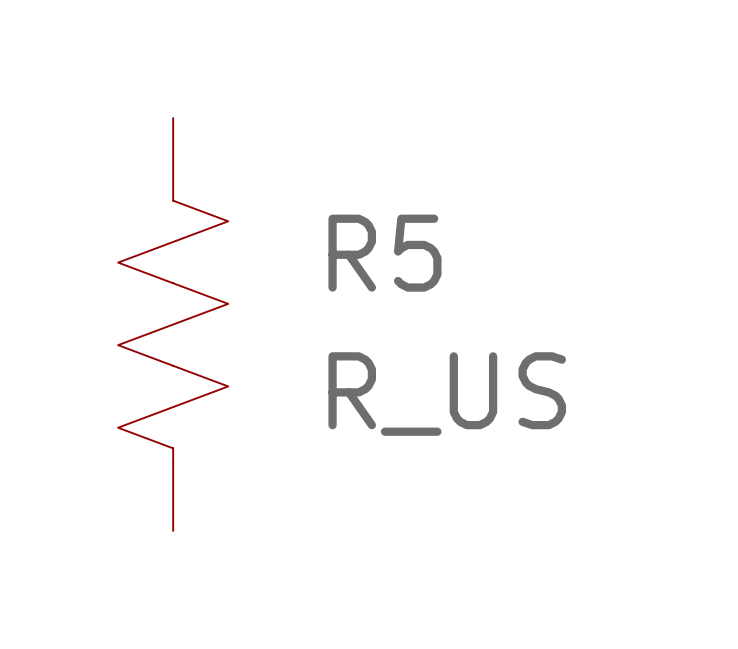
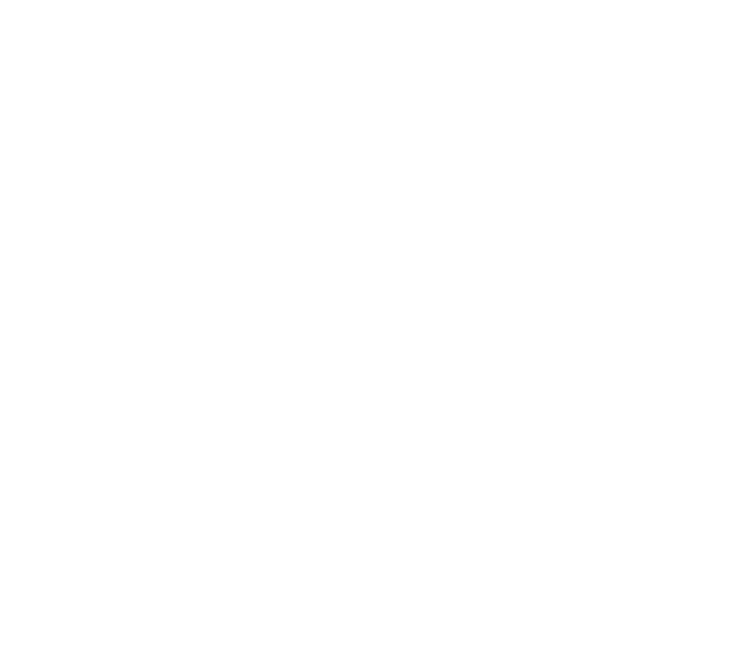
R5: R_US (173, 324) -> none

